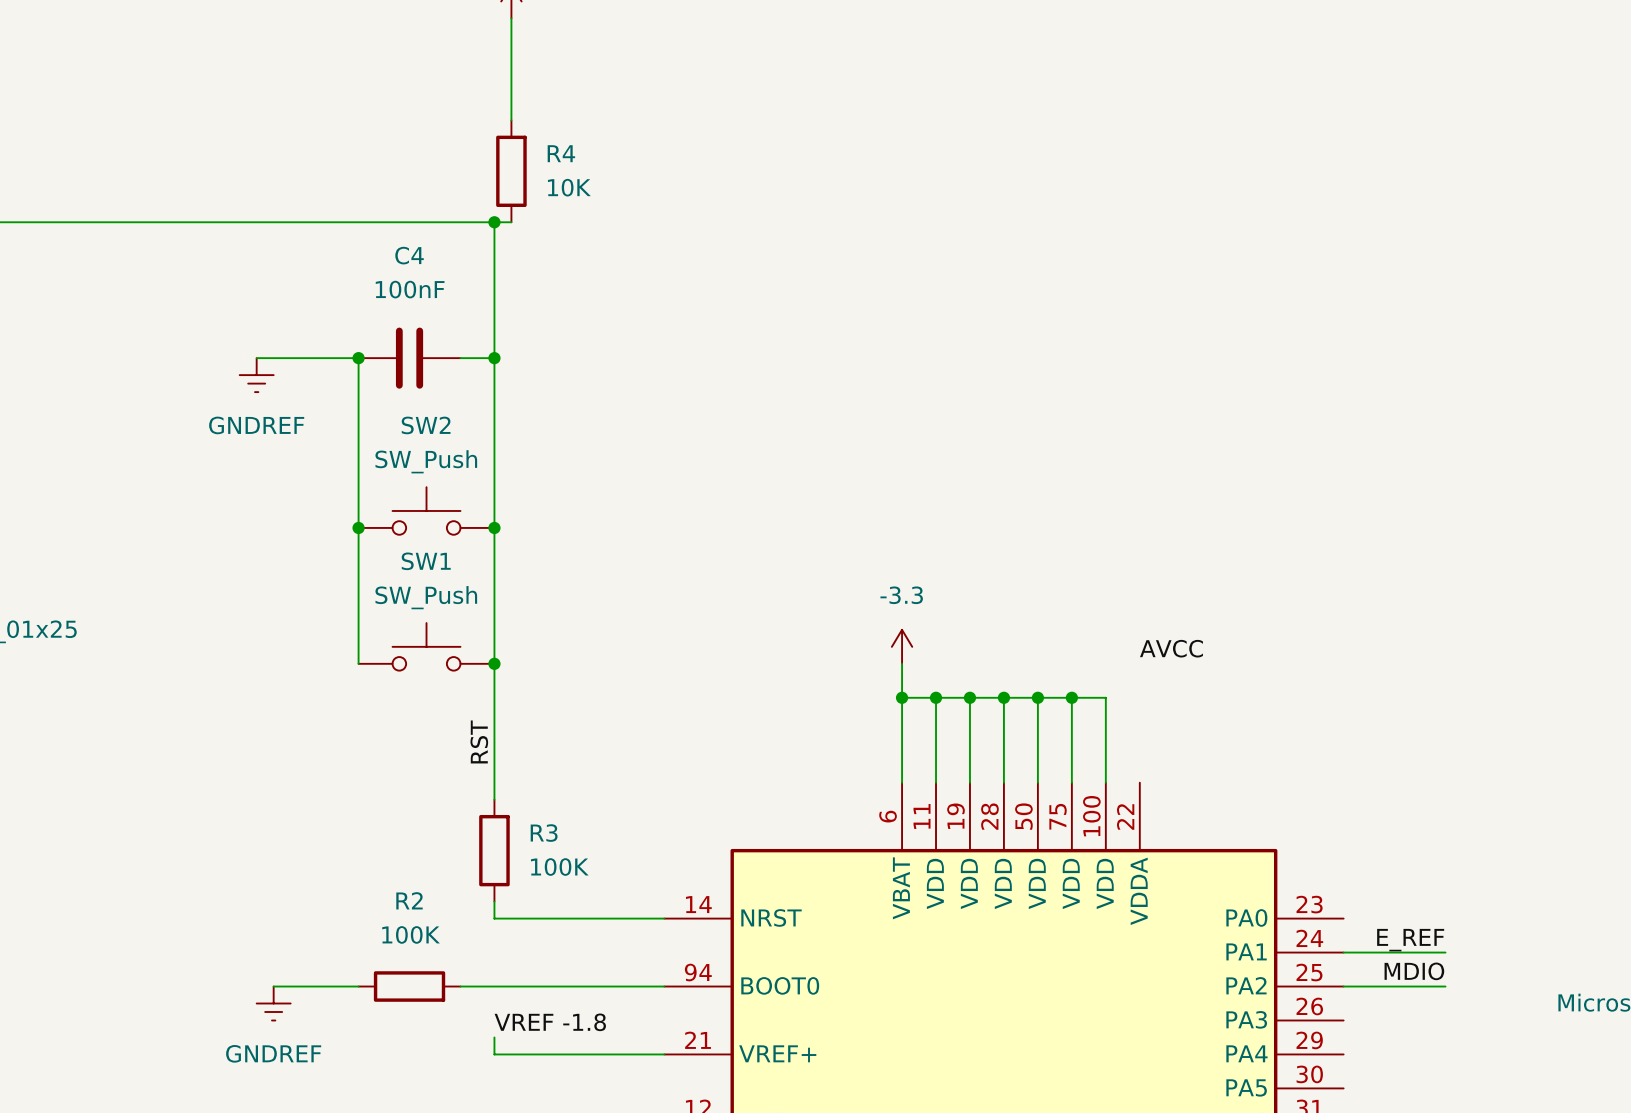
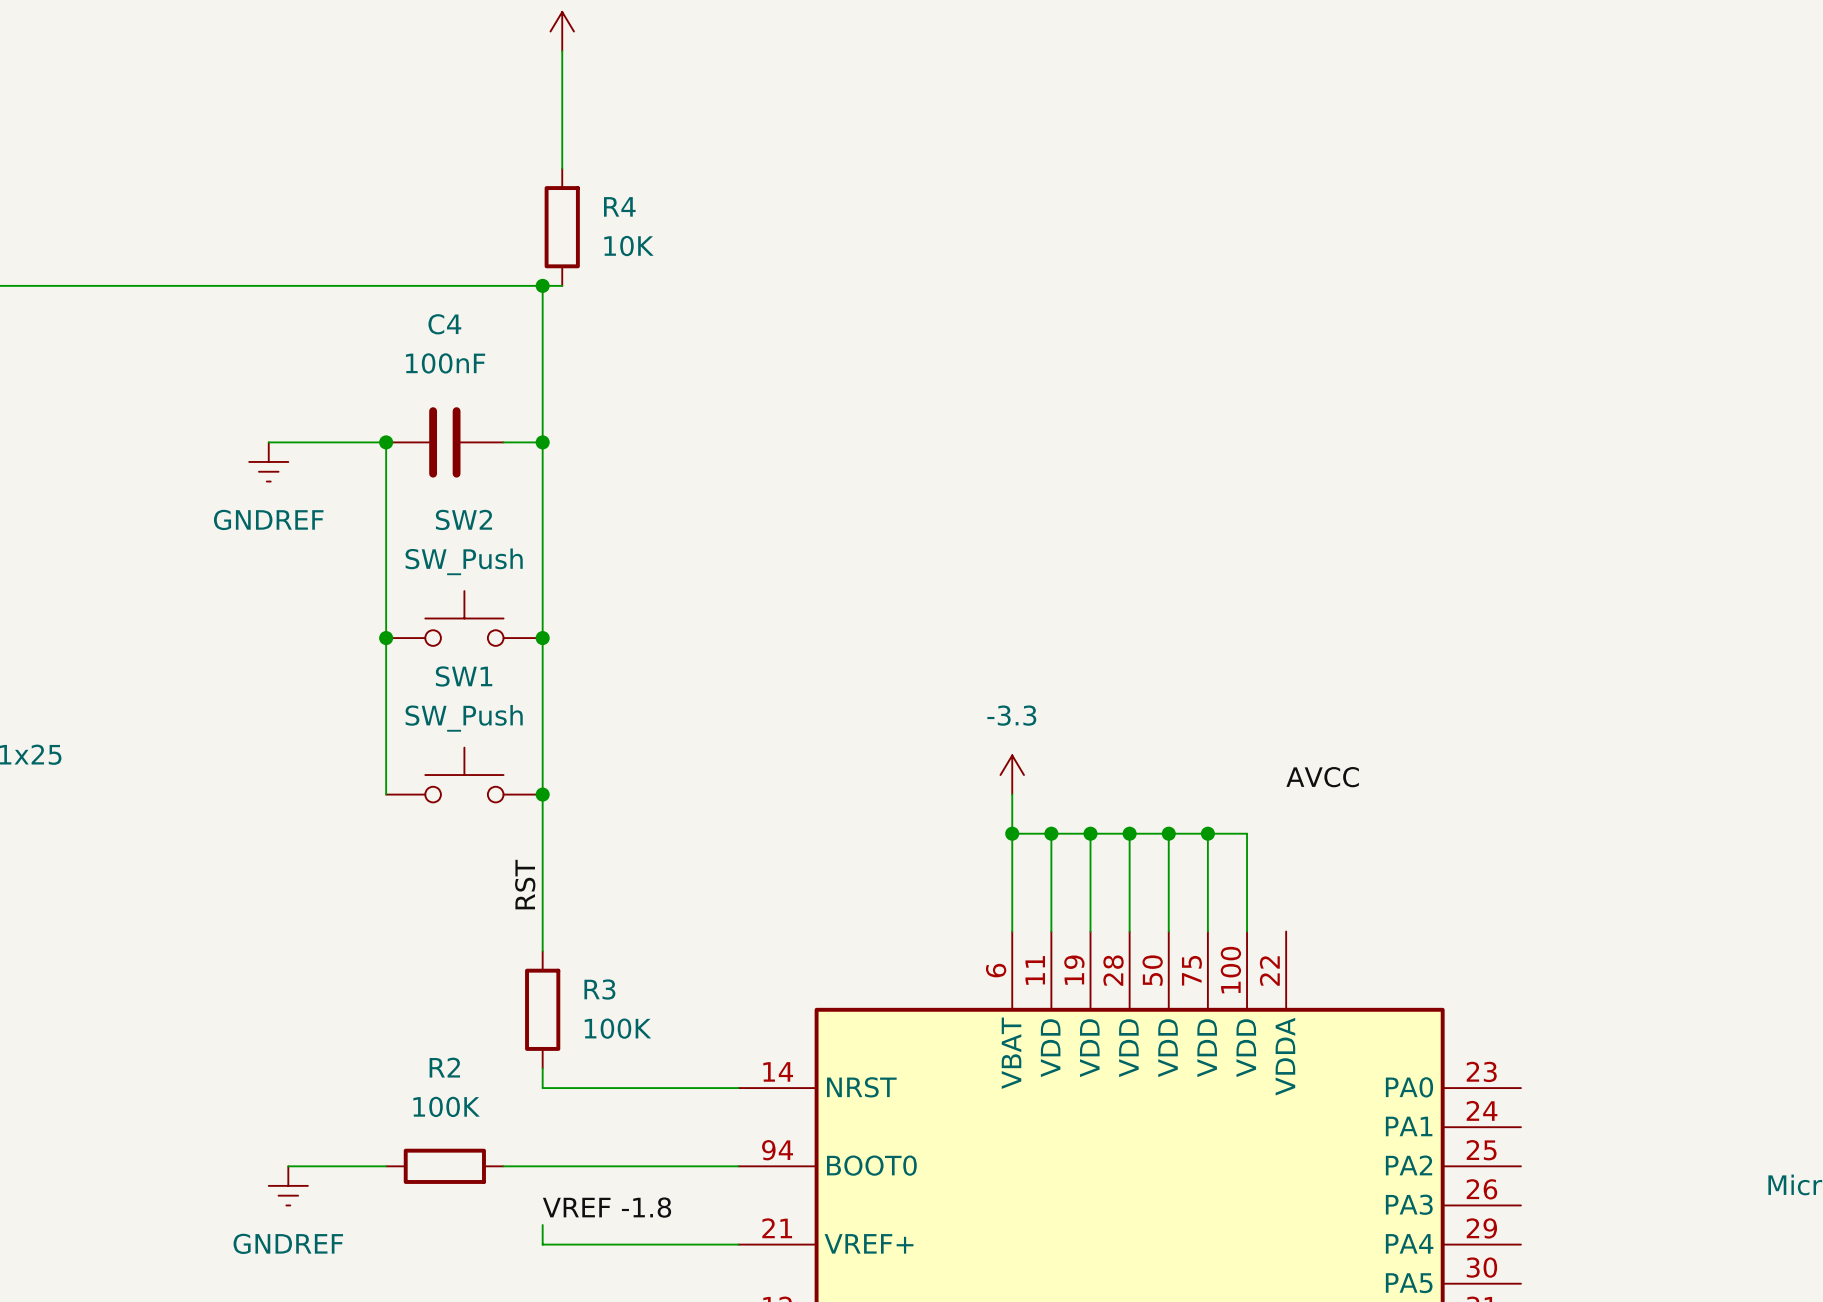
label: E_REF (1410, 940) -> none
wire: (1343, 952) (1445, 952) -> none
label: MDIO (1414, 971) -> none
wire: (1343, 986) (1445, 986) -> none

